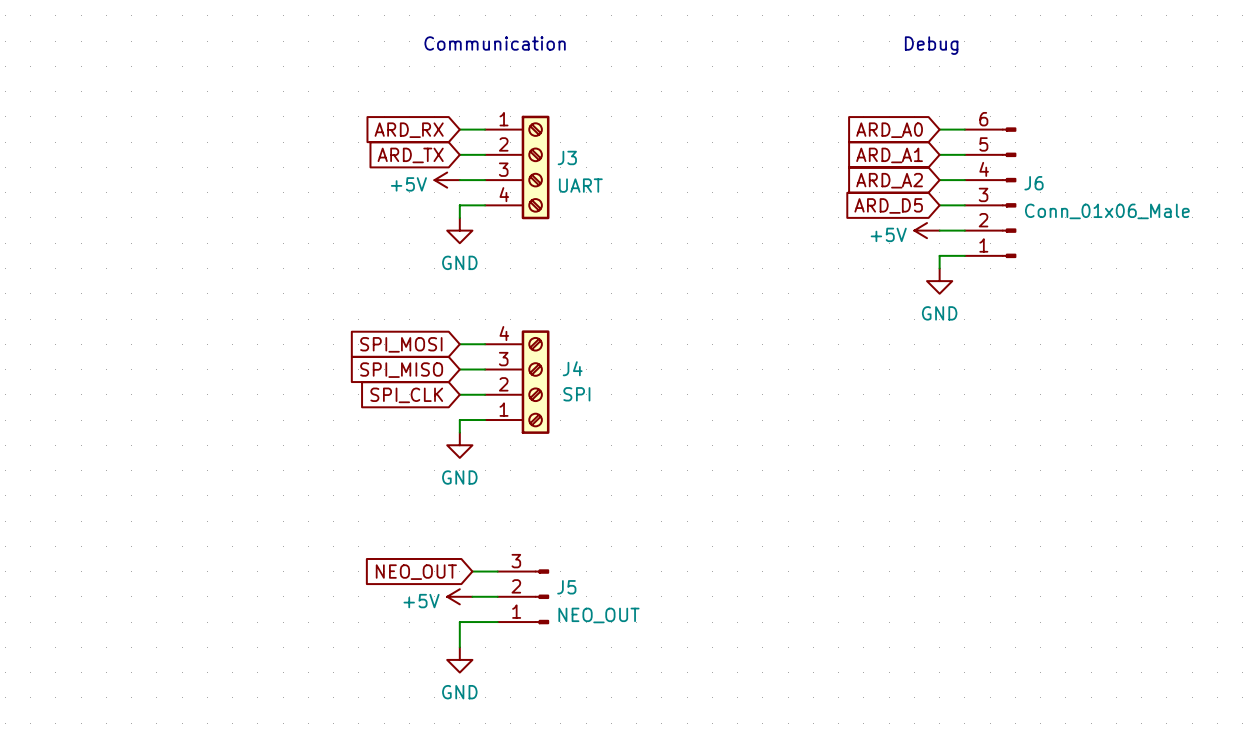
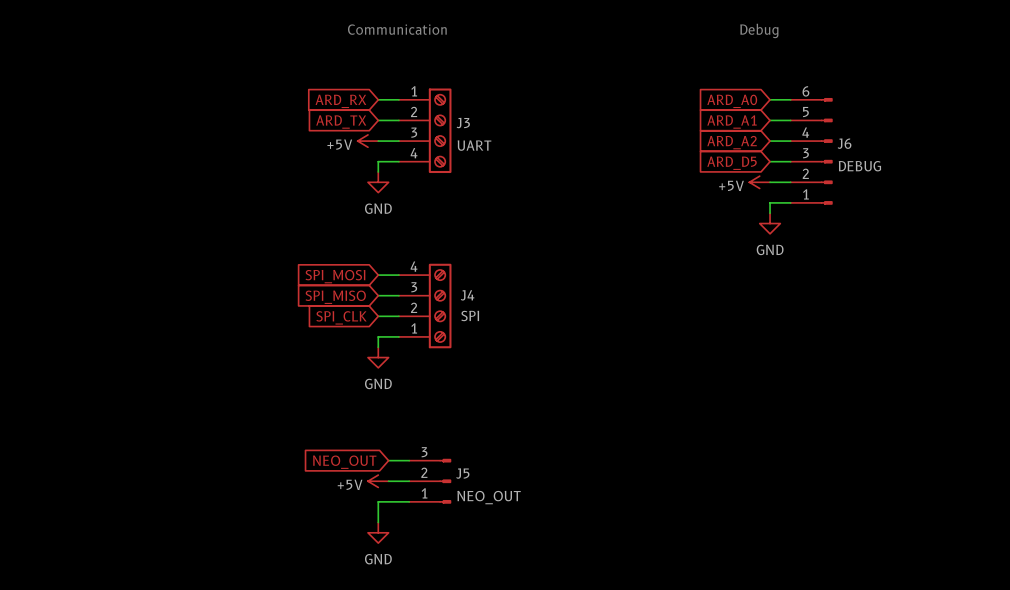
J6 value: Conn_01x06_Male (1107, 211) -> DEBUG (859, 166)

